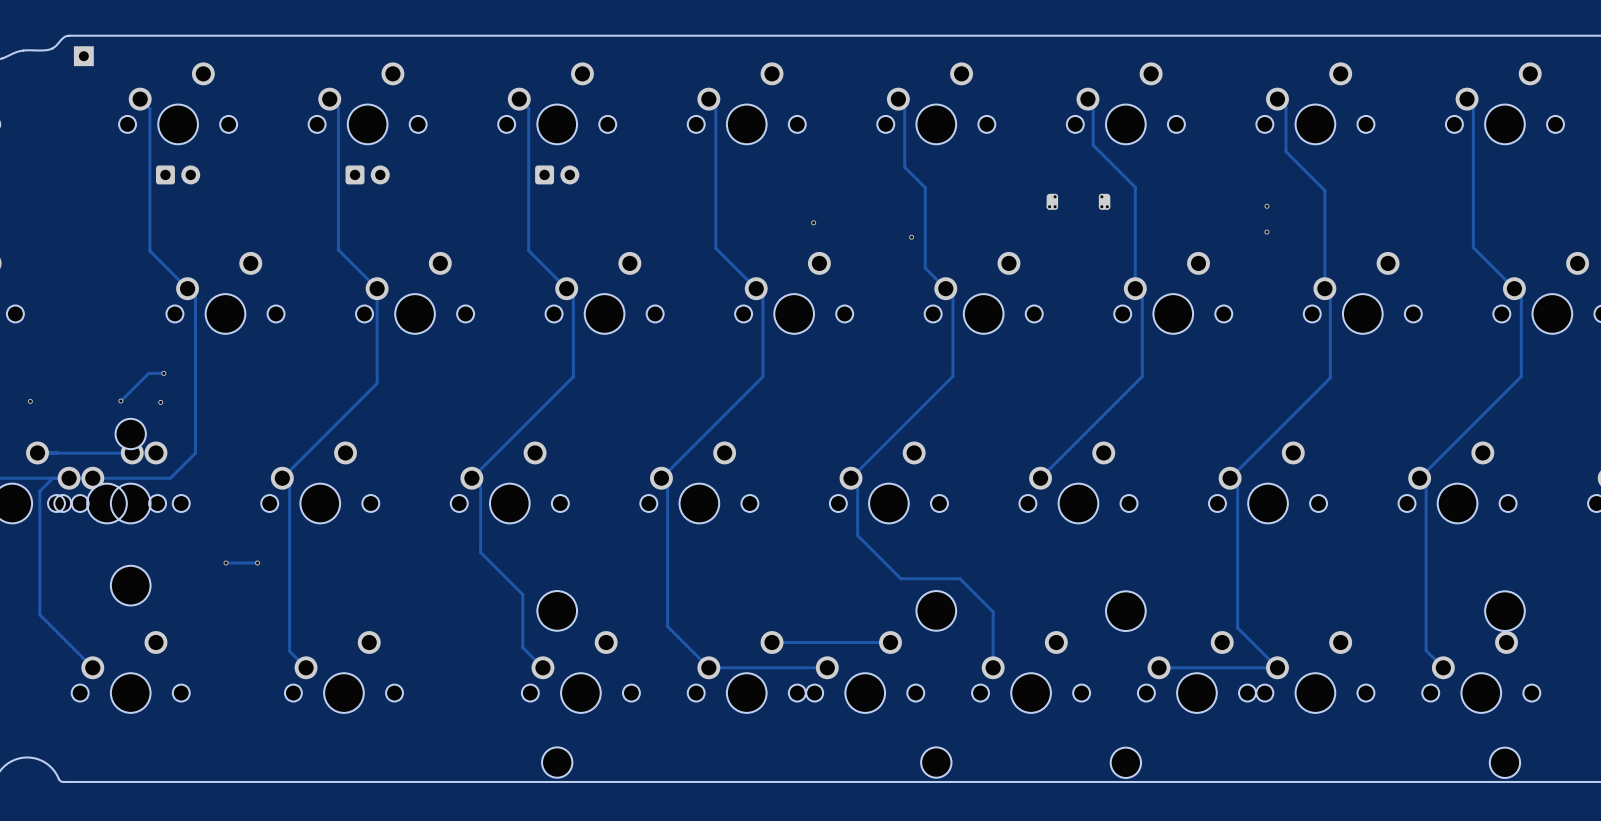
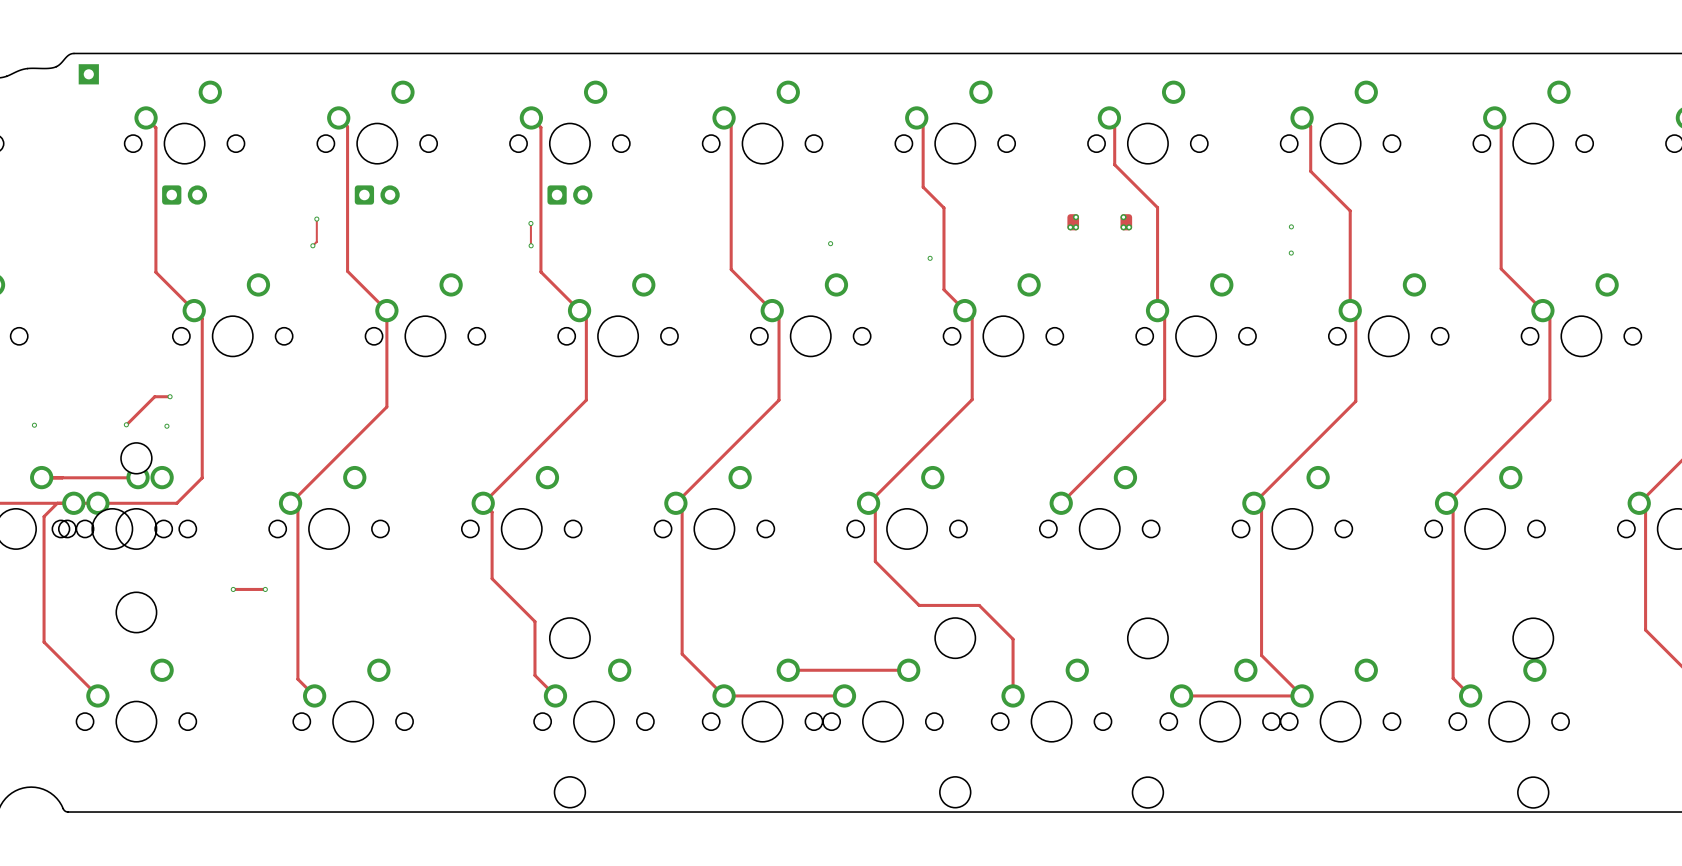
track: none -> (316, 219) (316, 241) (312, 245)
via: none -> (316, 219)
track: none -> (530, 223) (531, 245)
via: none -> (530, 223)
via: none -> (312, 245)
via: none -> (531, 245)

